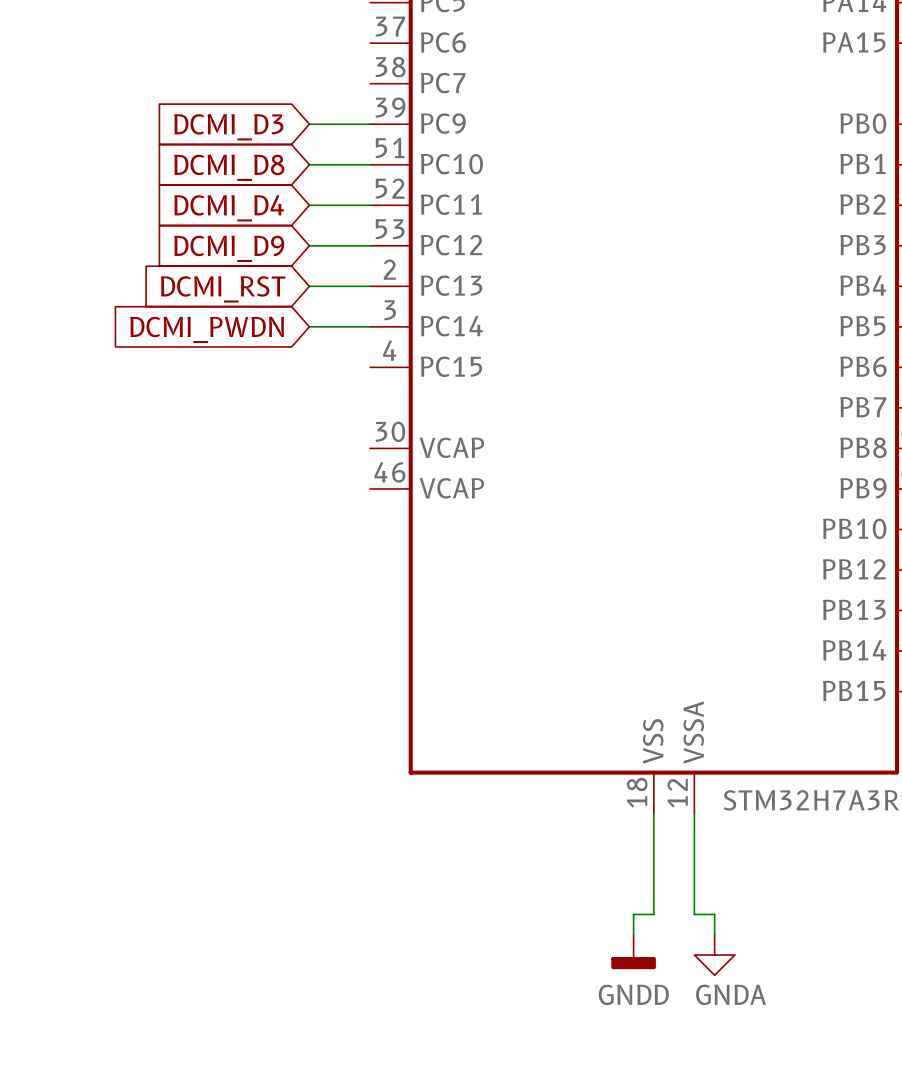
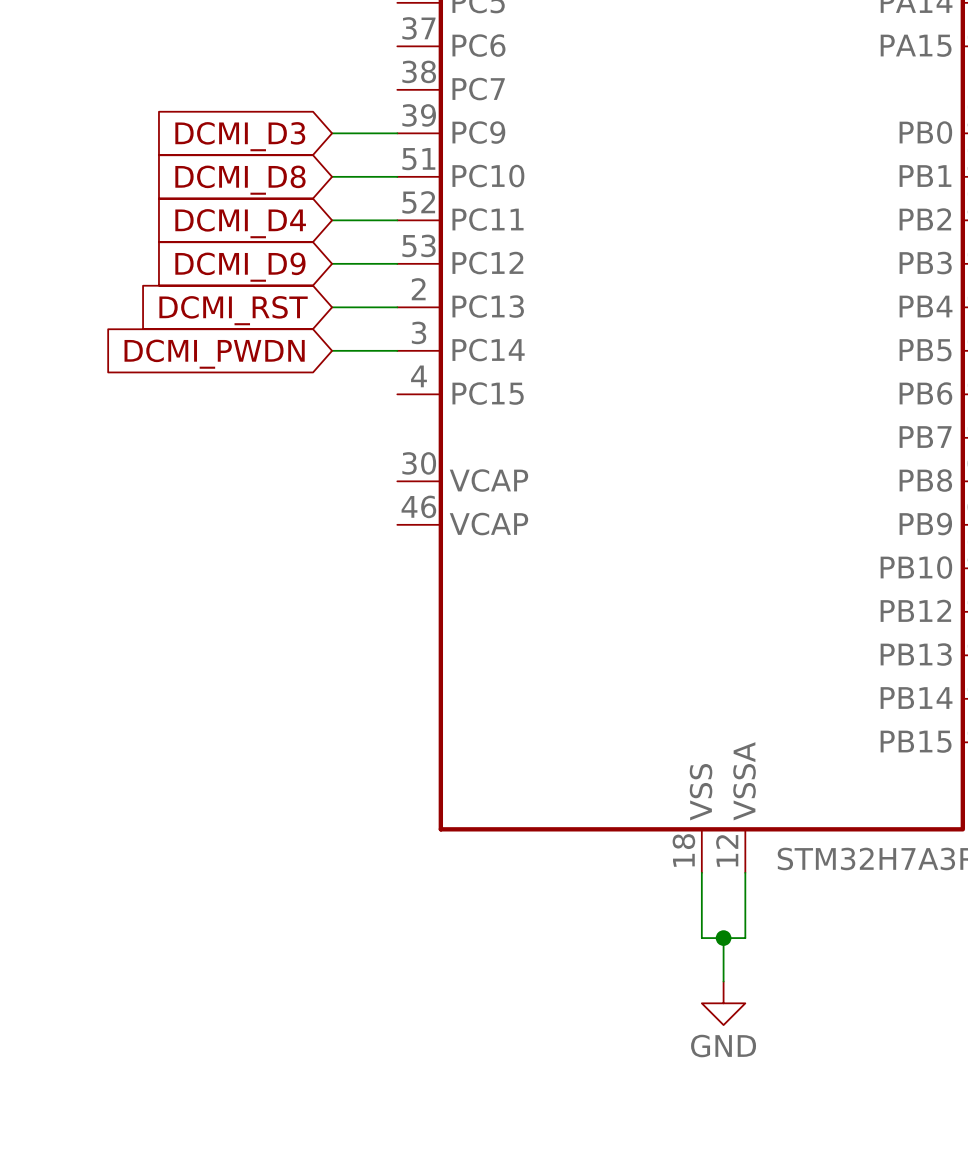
wire: (653, 873) (653, 914) (633, 914) (633, 934) -> (701, 938) (745, 938)
wire: none -> (723, 938) (723, 981)
junction: none -> (723, 938)
wire: (694, 873) (694, 914) (714, 914) (714, 934) -> none
power symbol: none -> GND (723, 1003)
power symbol: GNDD (633, 951) -> none
power symbol: GNDA (714, 955) -> none

